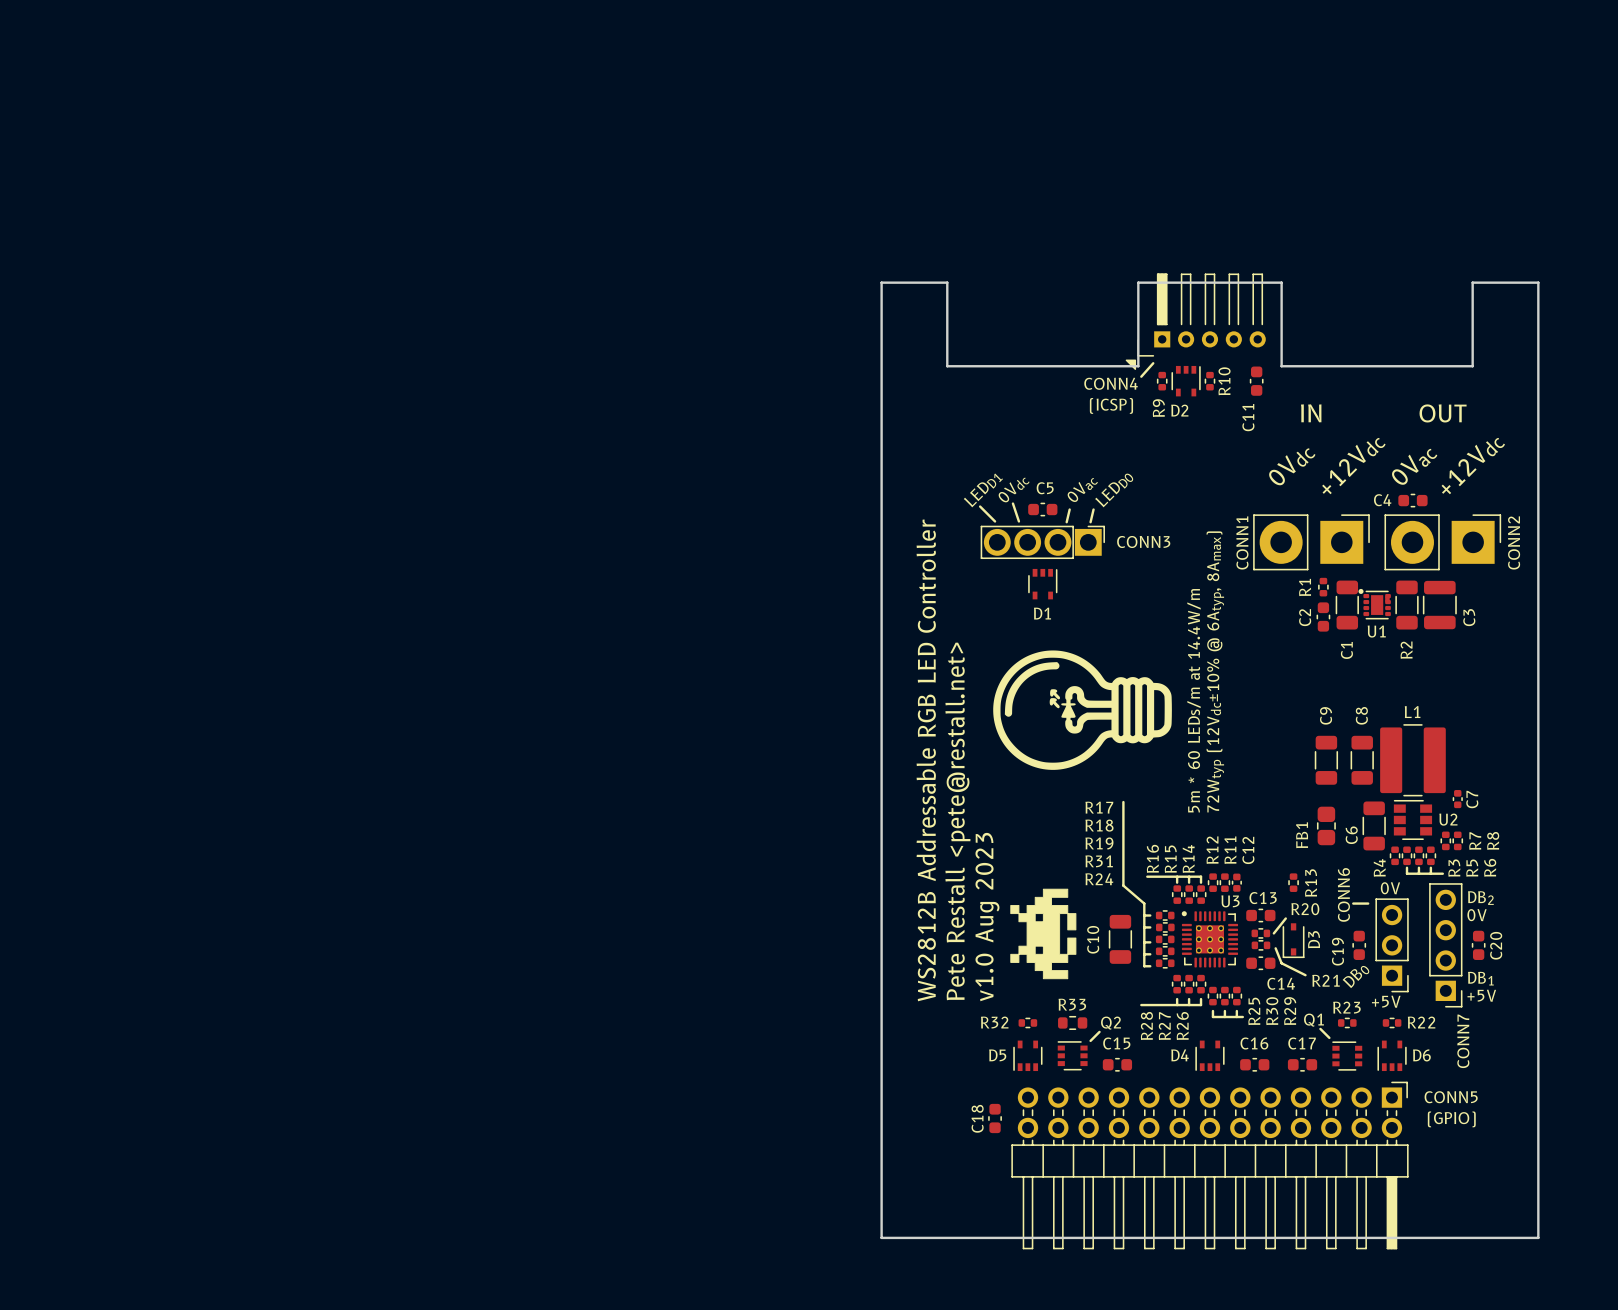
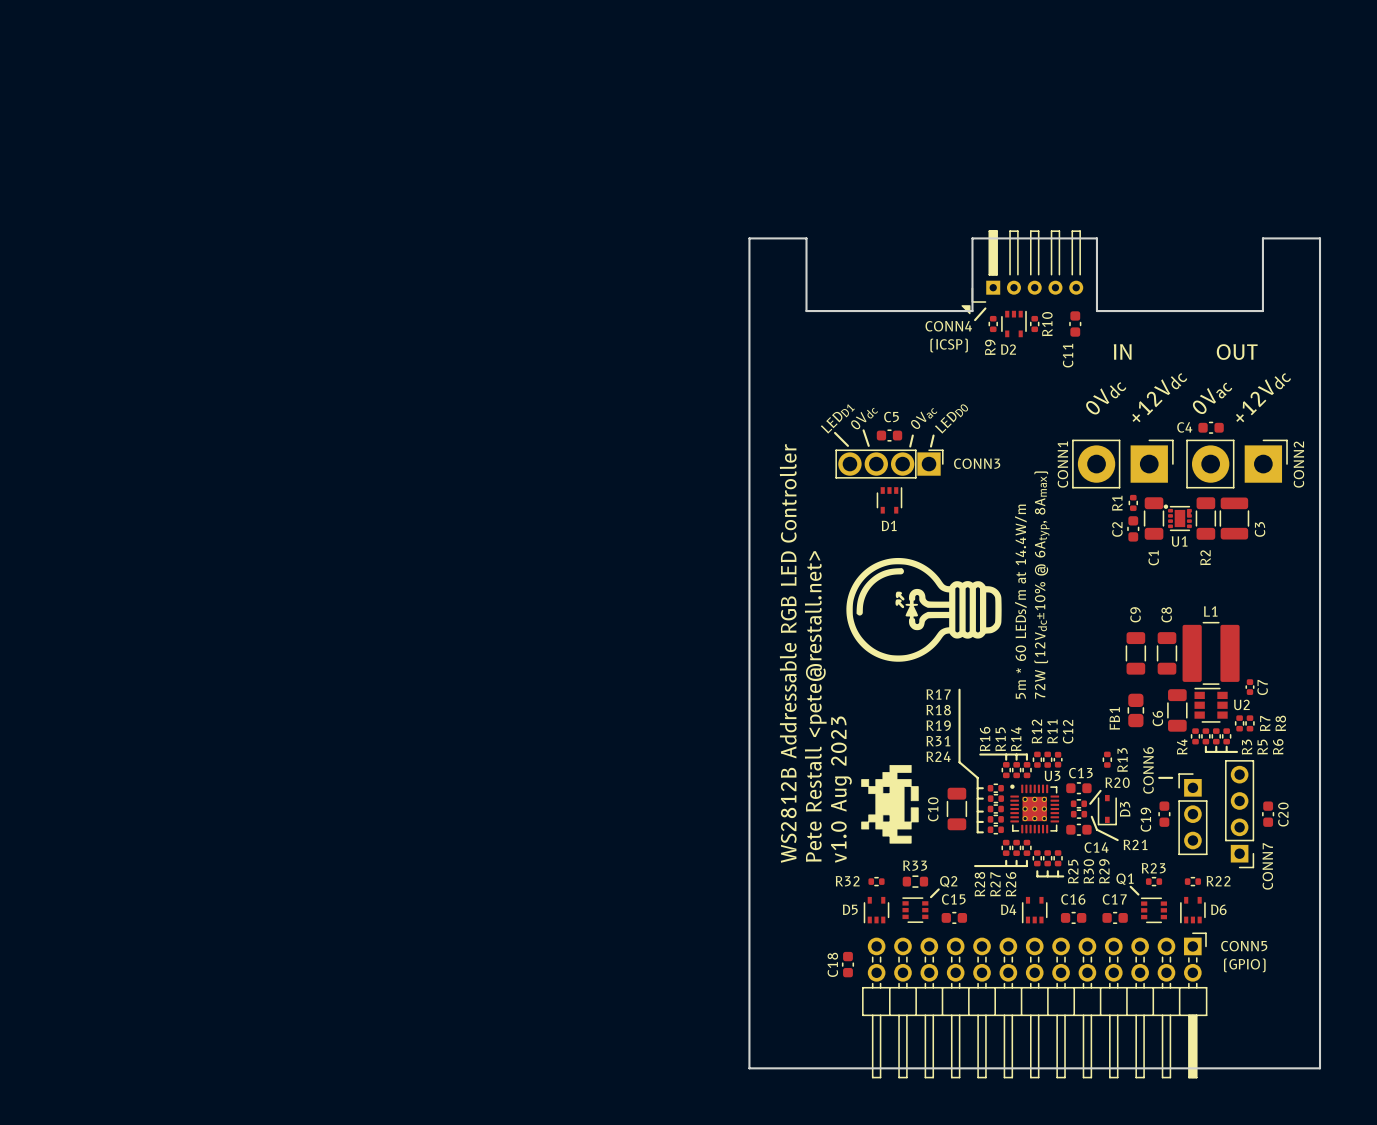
text: 72Wtyp (12Vdc±10% @ 6Atyp, 8Amax) (1215, 671) -> 72W (12Vdc±10% @ 6Atyp, 8Amax) (1041, 585)
text: 0V (1390, 888) -> none
text: DB2 (1480, 898) -> none
text: 0V (1477, 915) -> none
CONN6 rotation: 0° (1392, 945) -> 180° (1192, 814)
text: DB0 (1355, 977) -> none
text: DB1 (1480, 978) -> none
text: +5V (1481, 995) -> none
text: +5V (1386, 1001) -> none
CONN7 name position: CONN7 (1463, 1041) -> CONN7 (1267, 866)

